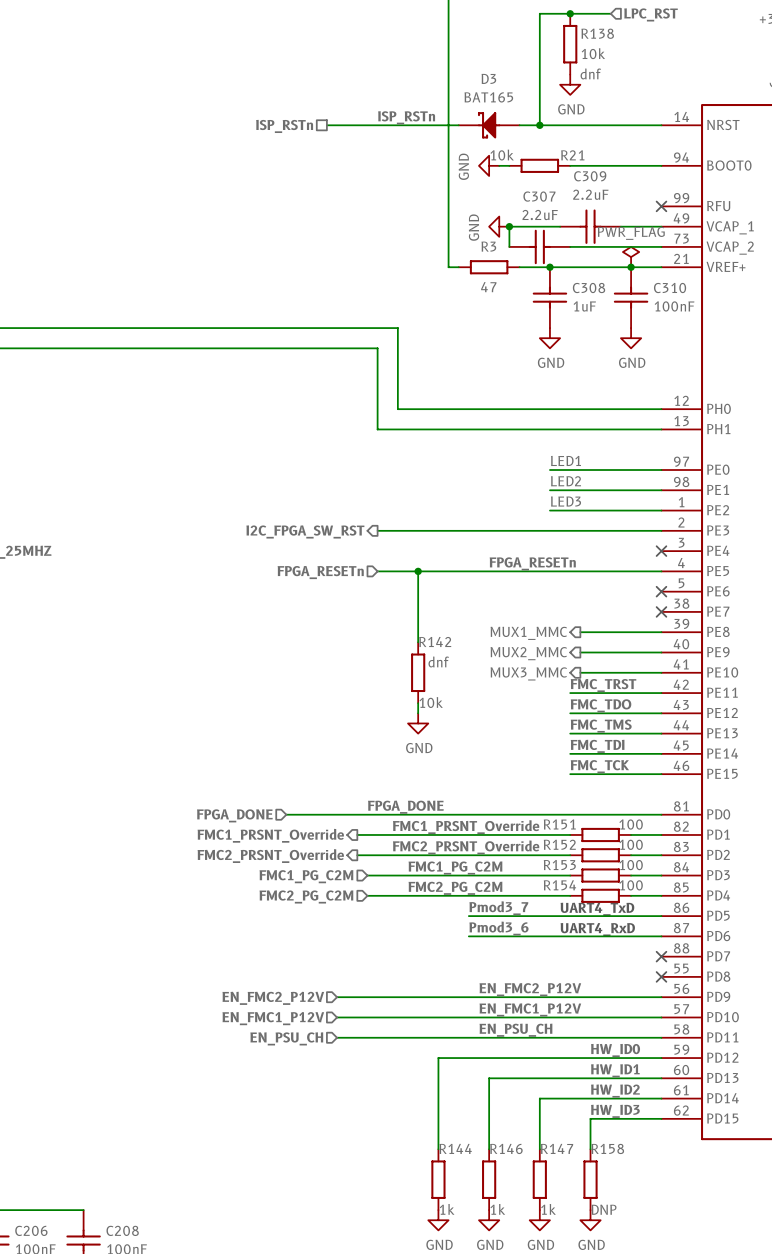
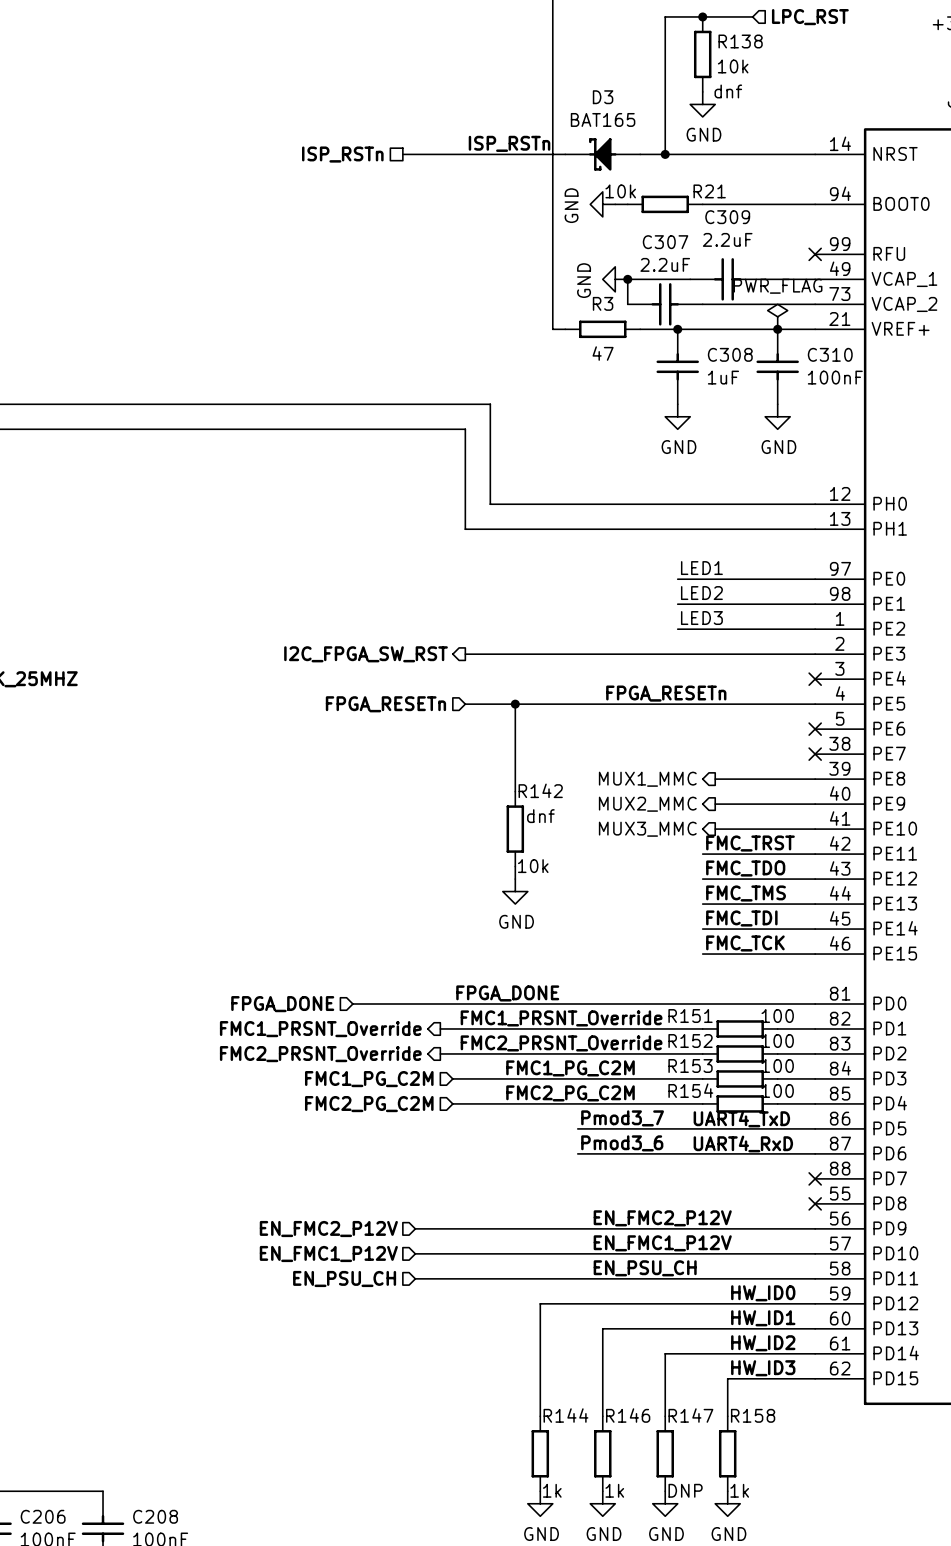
R147 text: 1k (548, 1209) -> DNP (685, 1490)
R158 text: DNP (604, 1209) -> 1k (739, 1490)

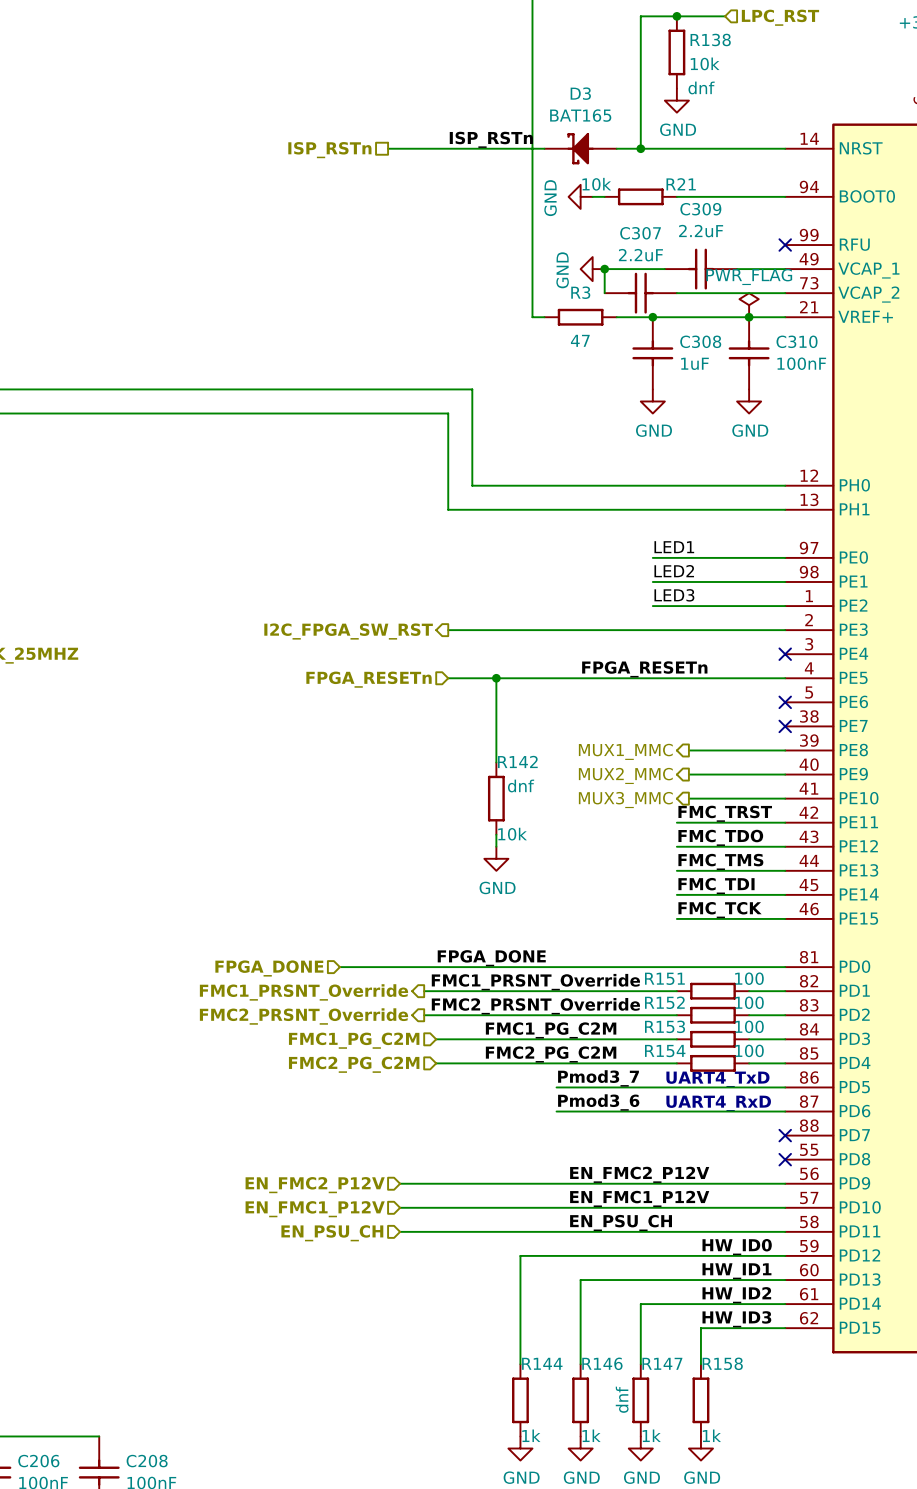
R147 text: none -> dnf (622, 1399)
R147 text: DNP (685, 1490) -> 1k (651, 1435)

